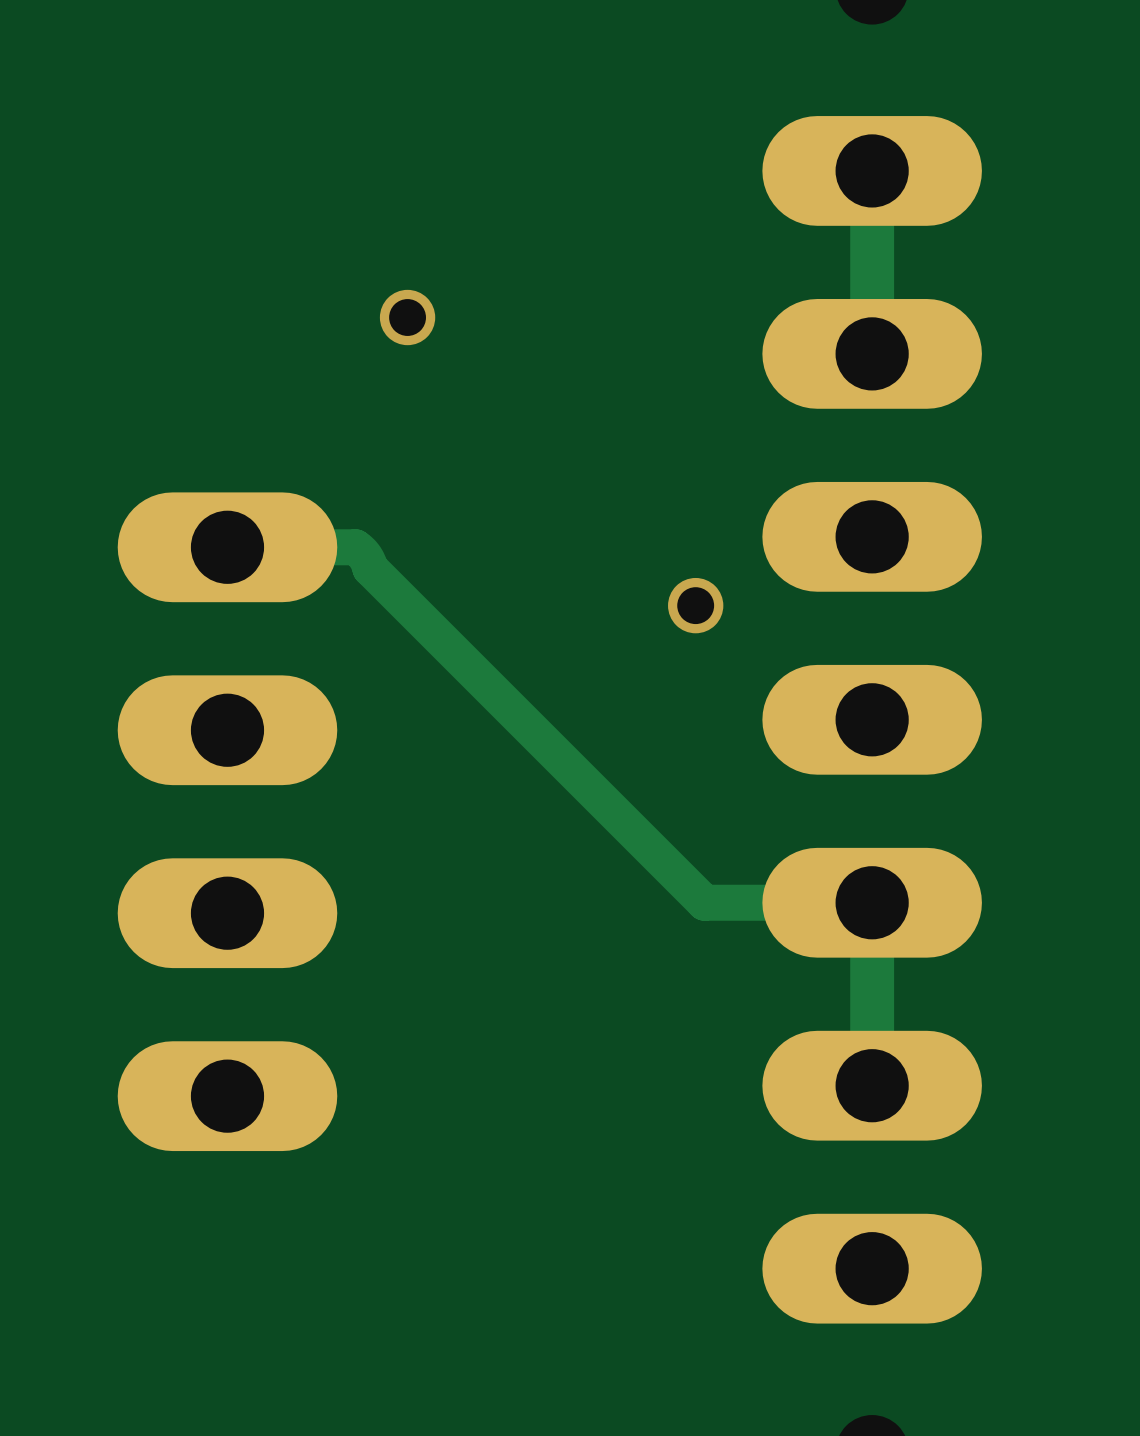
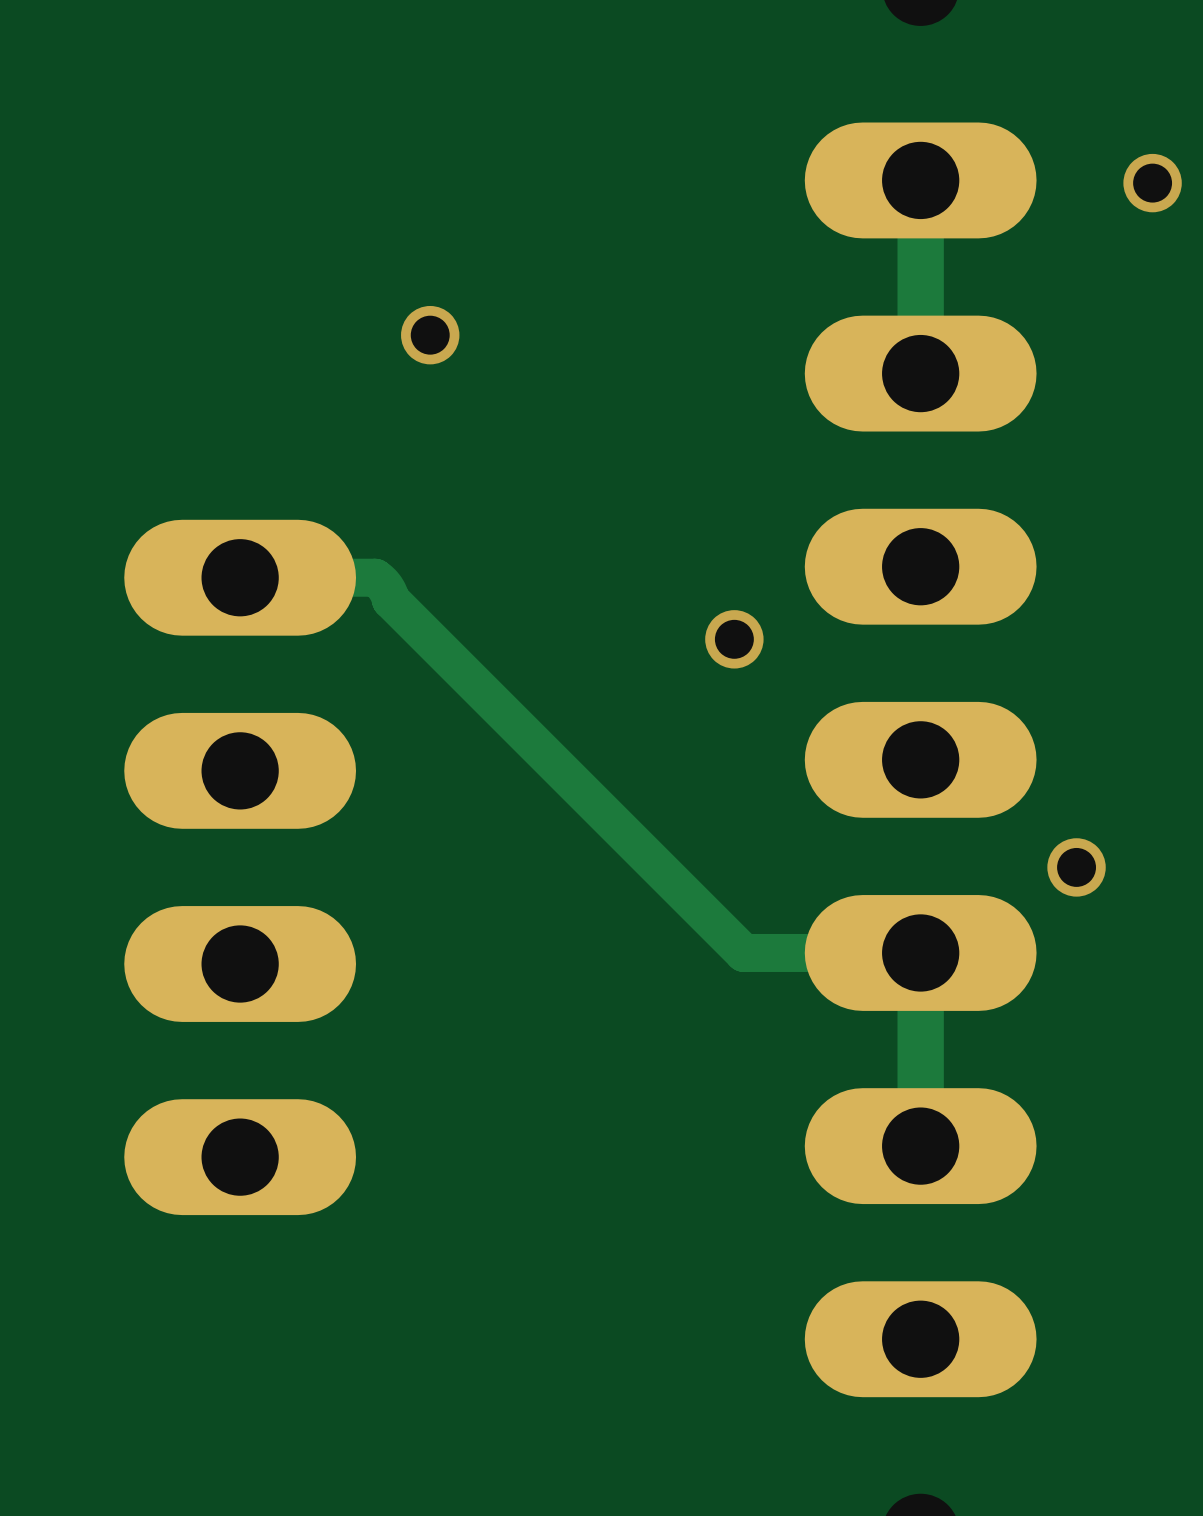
via: none -> (1152, 183)
via: none -> (1076, 867)

